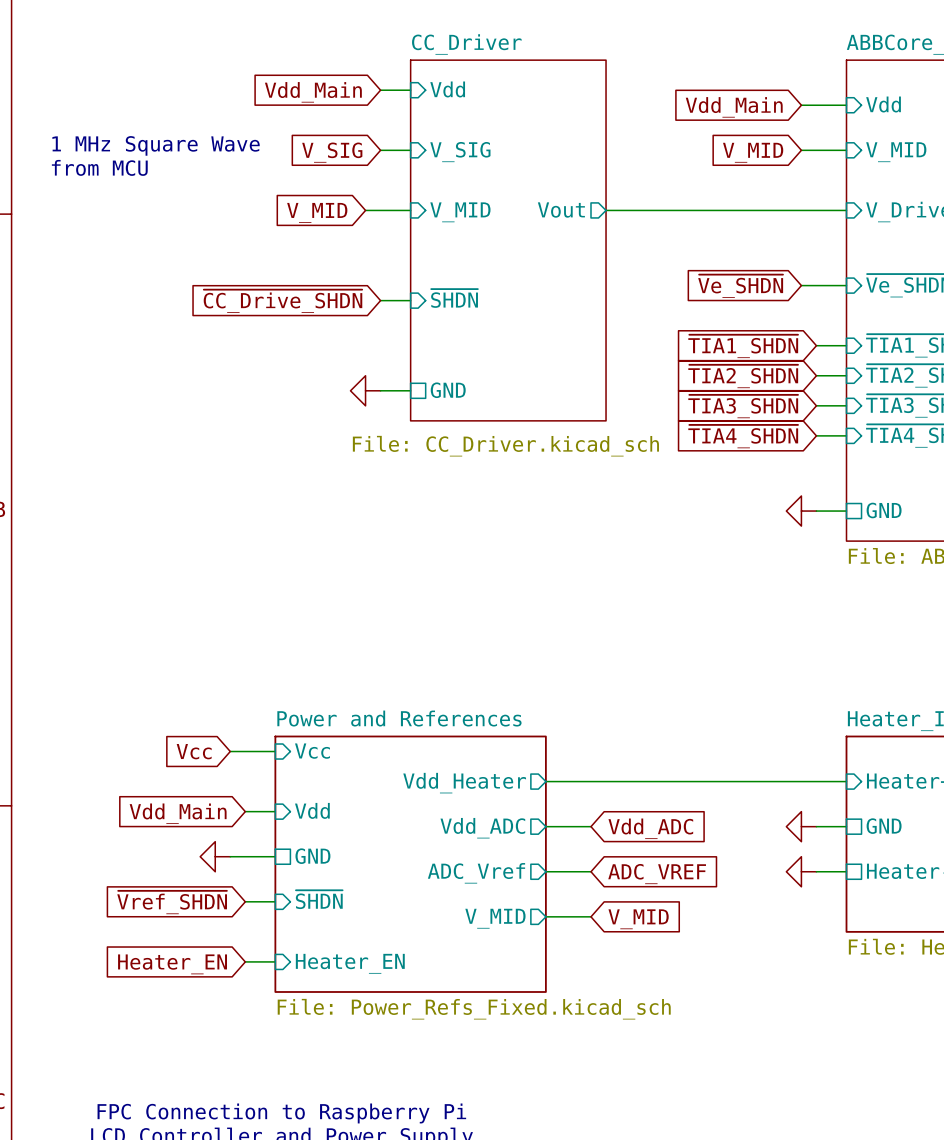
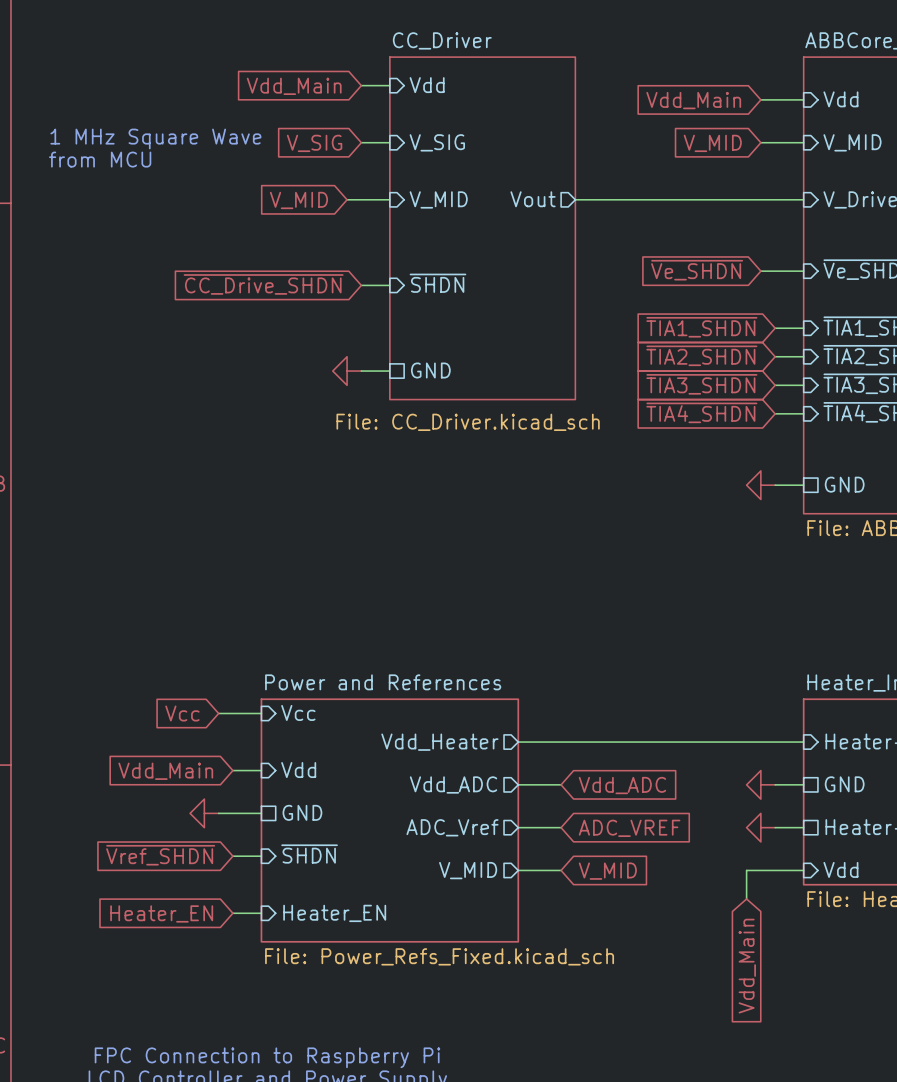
wire: none -> (803, 870) (746, 870) (746, 899)
sheet pin: none -> Vdd (840, 869)
global label: none -> Vdd_Main (747, 966)

